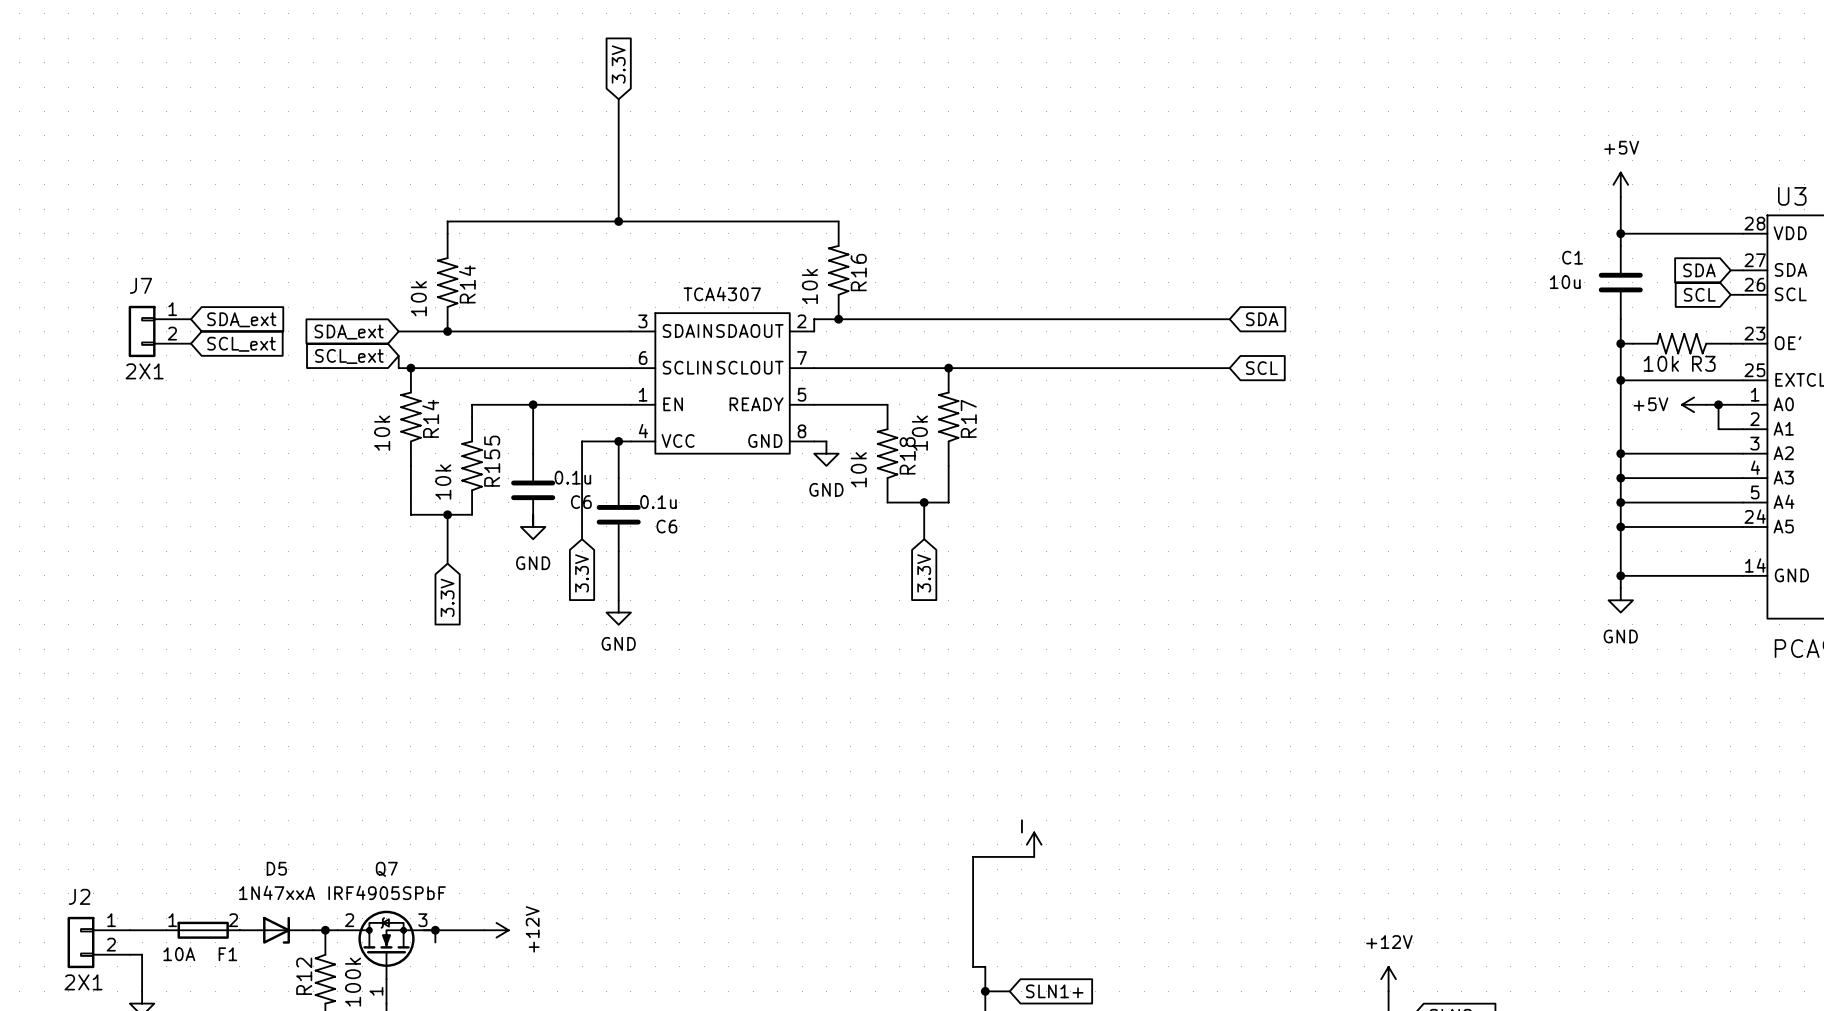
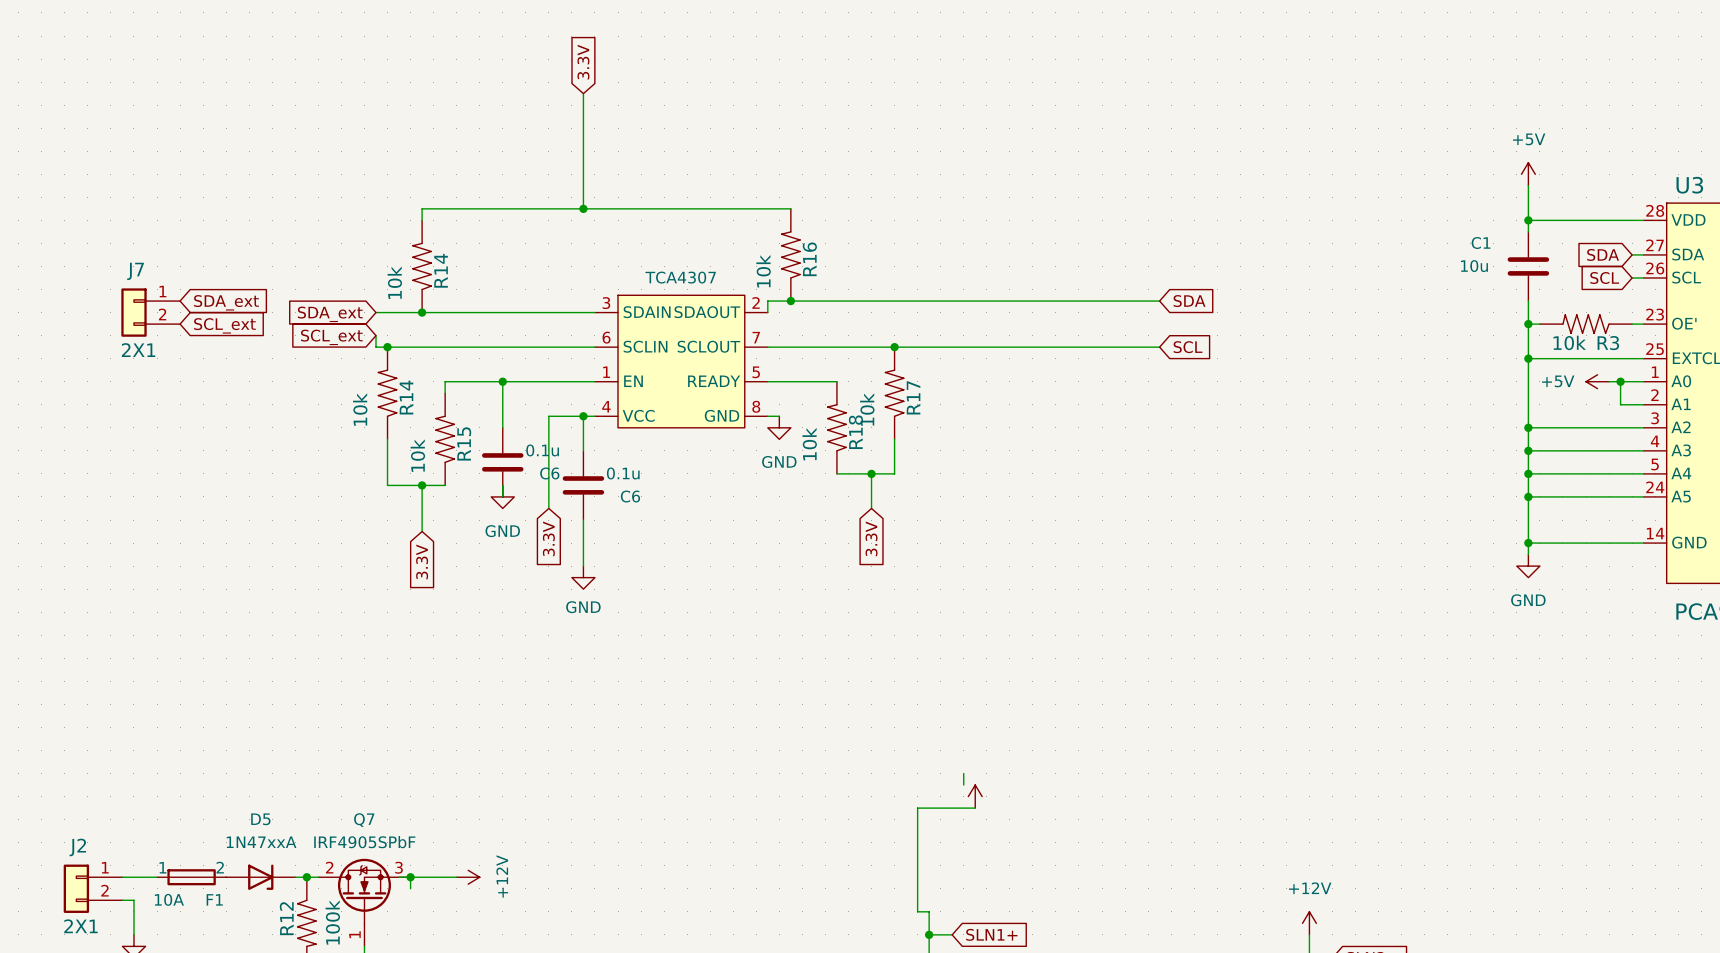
R155 name: R155 (492, 461) -> R15 (464, 443)

